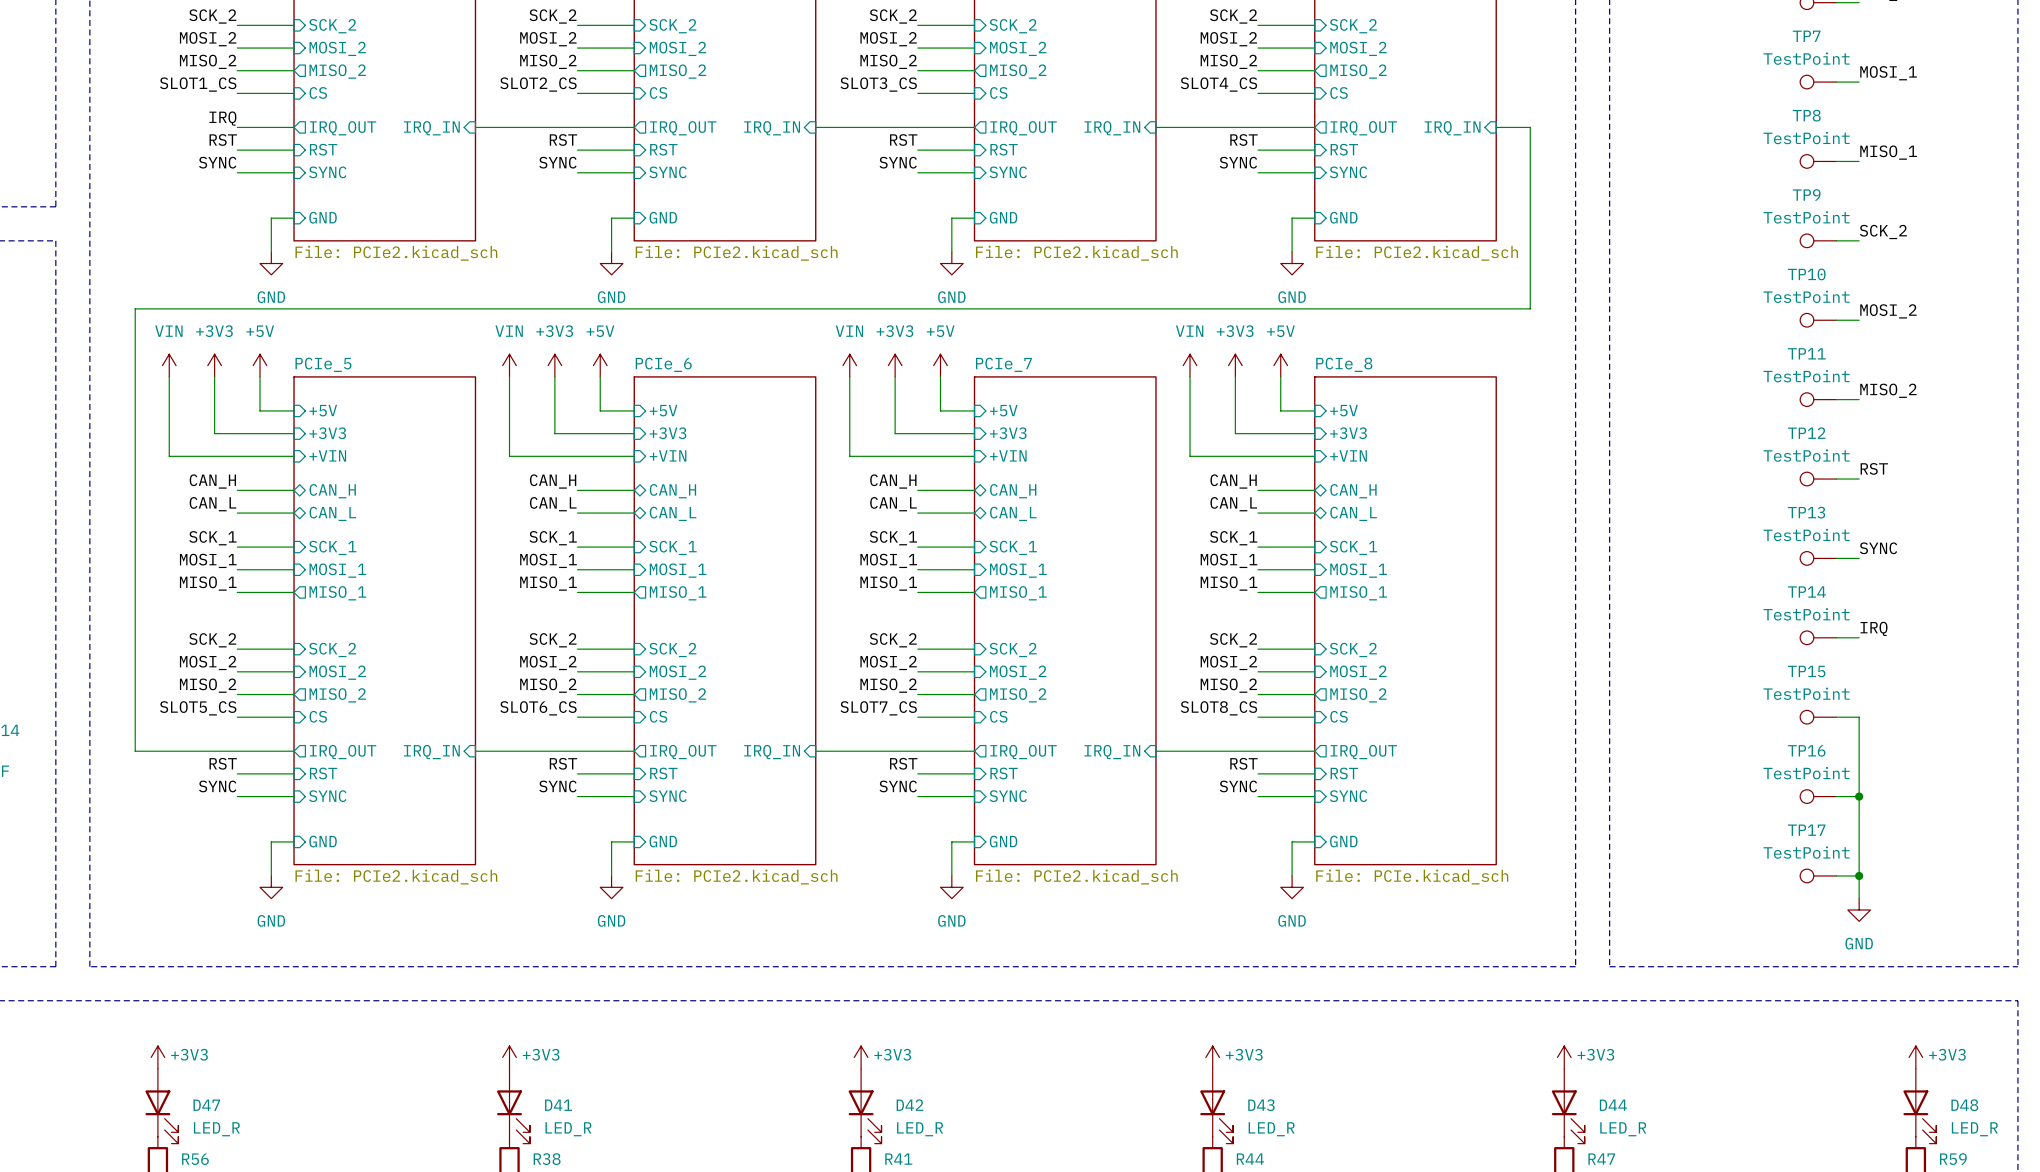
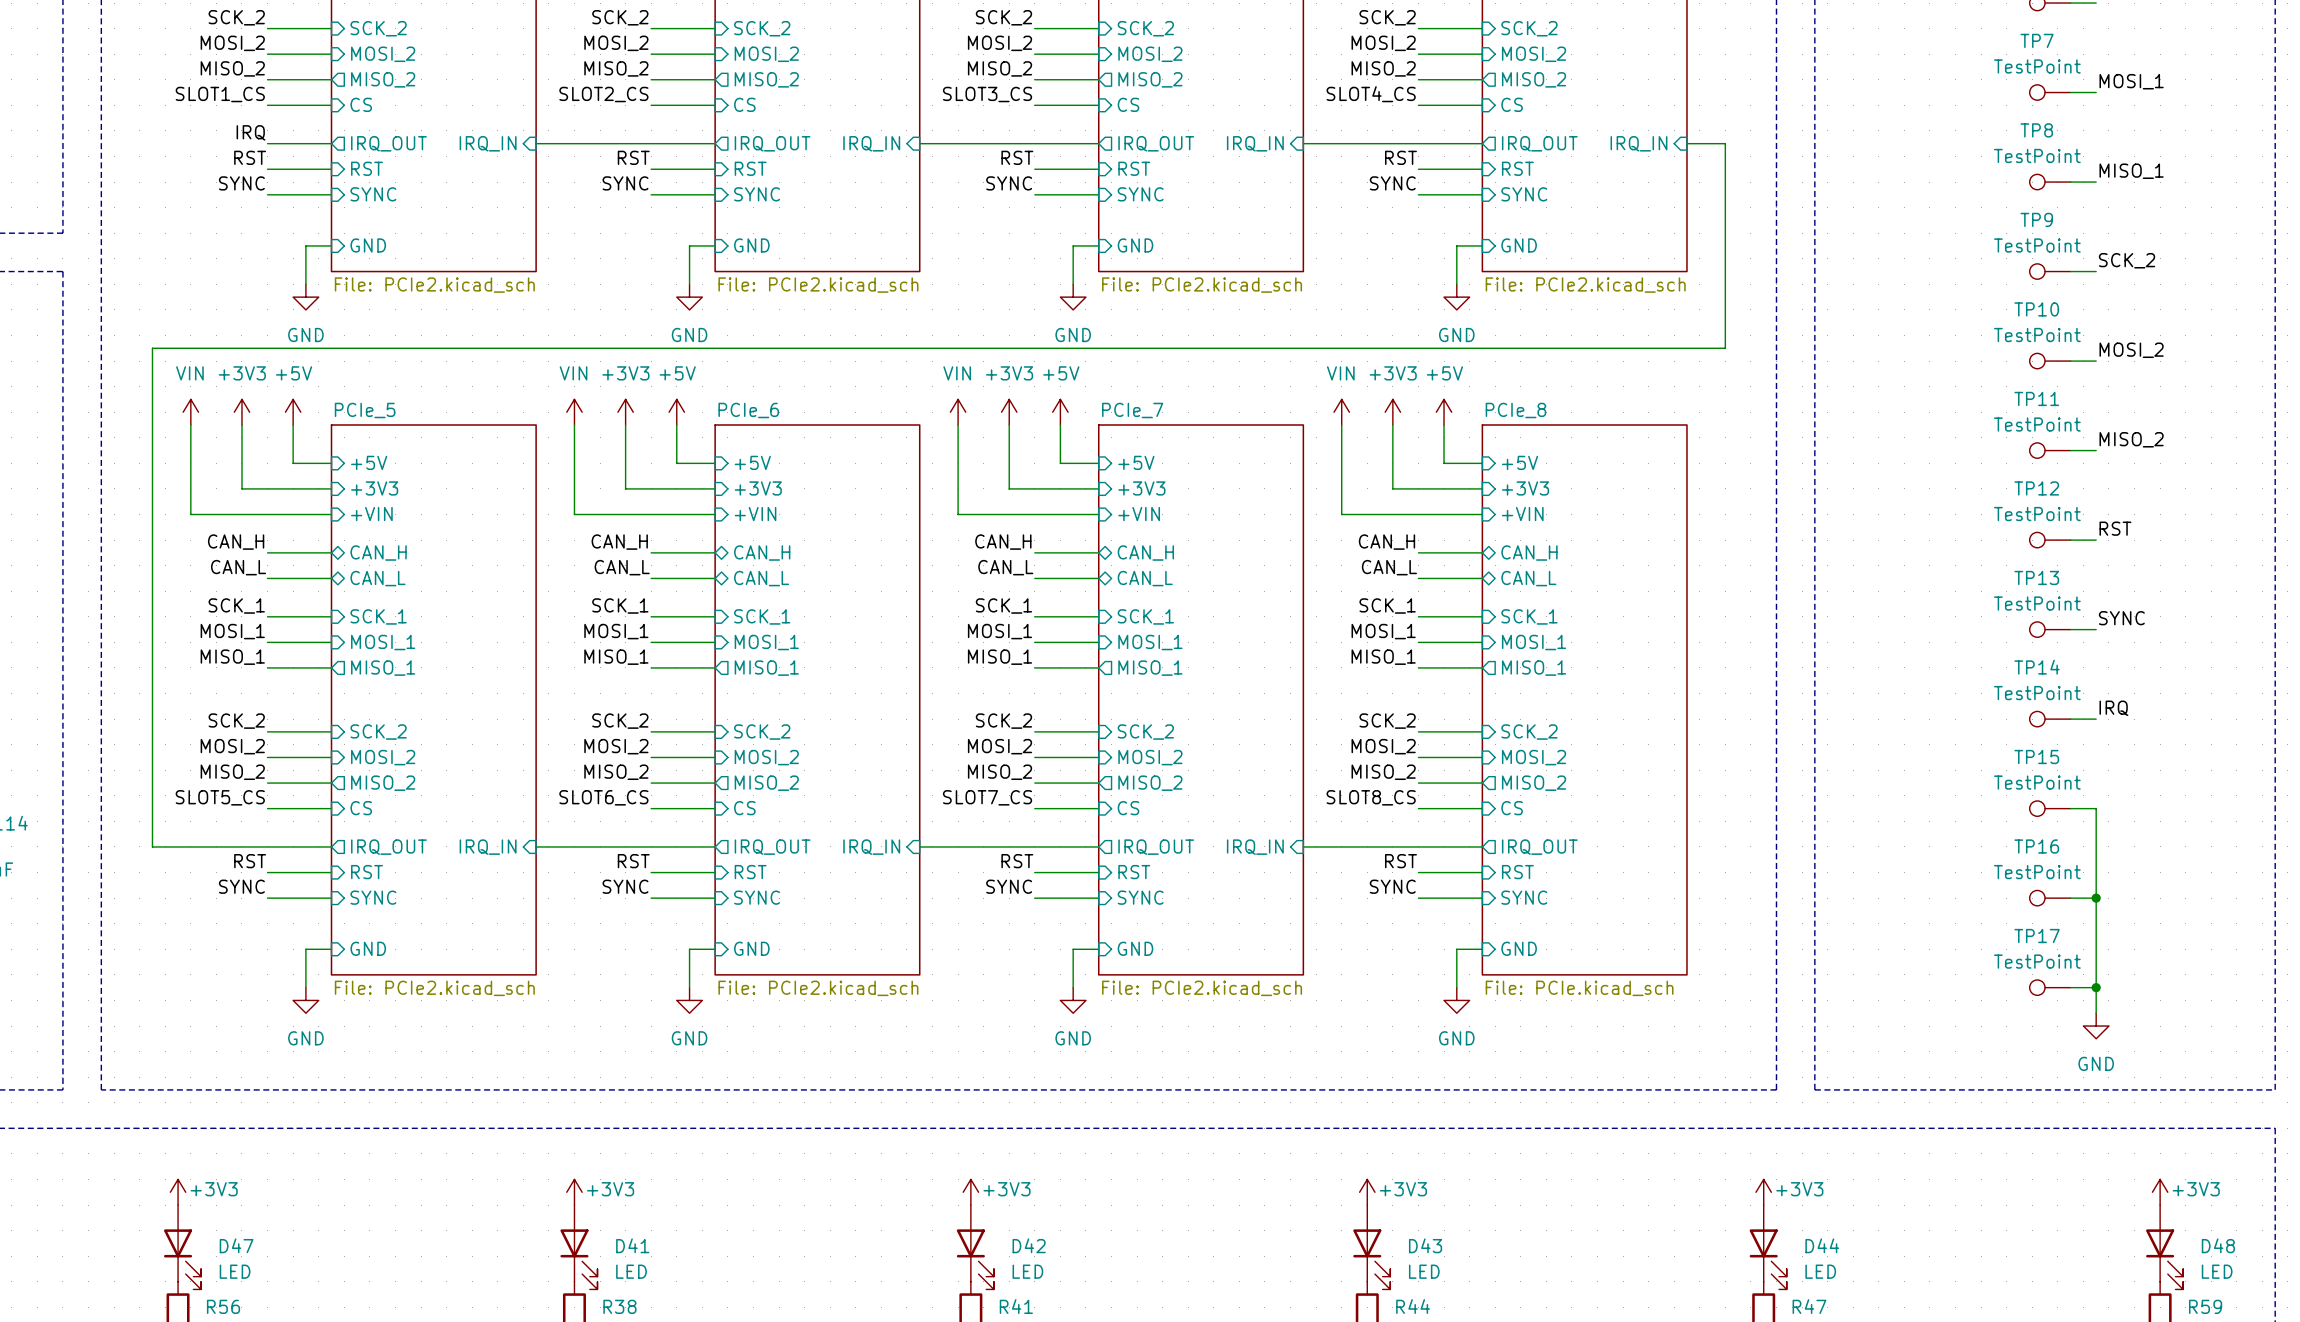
D47 value: LED_R (216, 1129) -> LED (235, 1271)
D41 value: LED_R (568, 1129) -> LED (631, 1271)
D42 value: LED_R (920, 1129) -> LED (1027, 1271)
D43 value: LED_R (1271, 1129) -> LED (1424, 1271)
D44 value: LED_R (1623, 1129) -> LED (1820, 1271)
D48 value: LED_R (1974, 1129) -> LED (2217, 1271)

